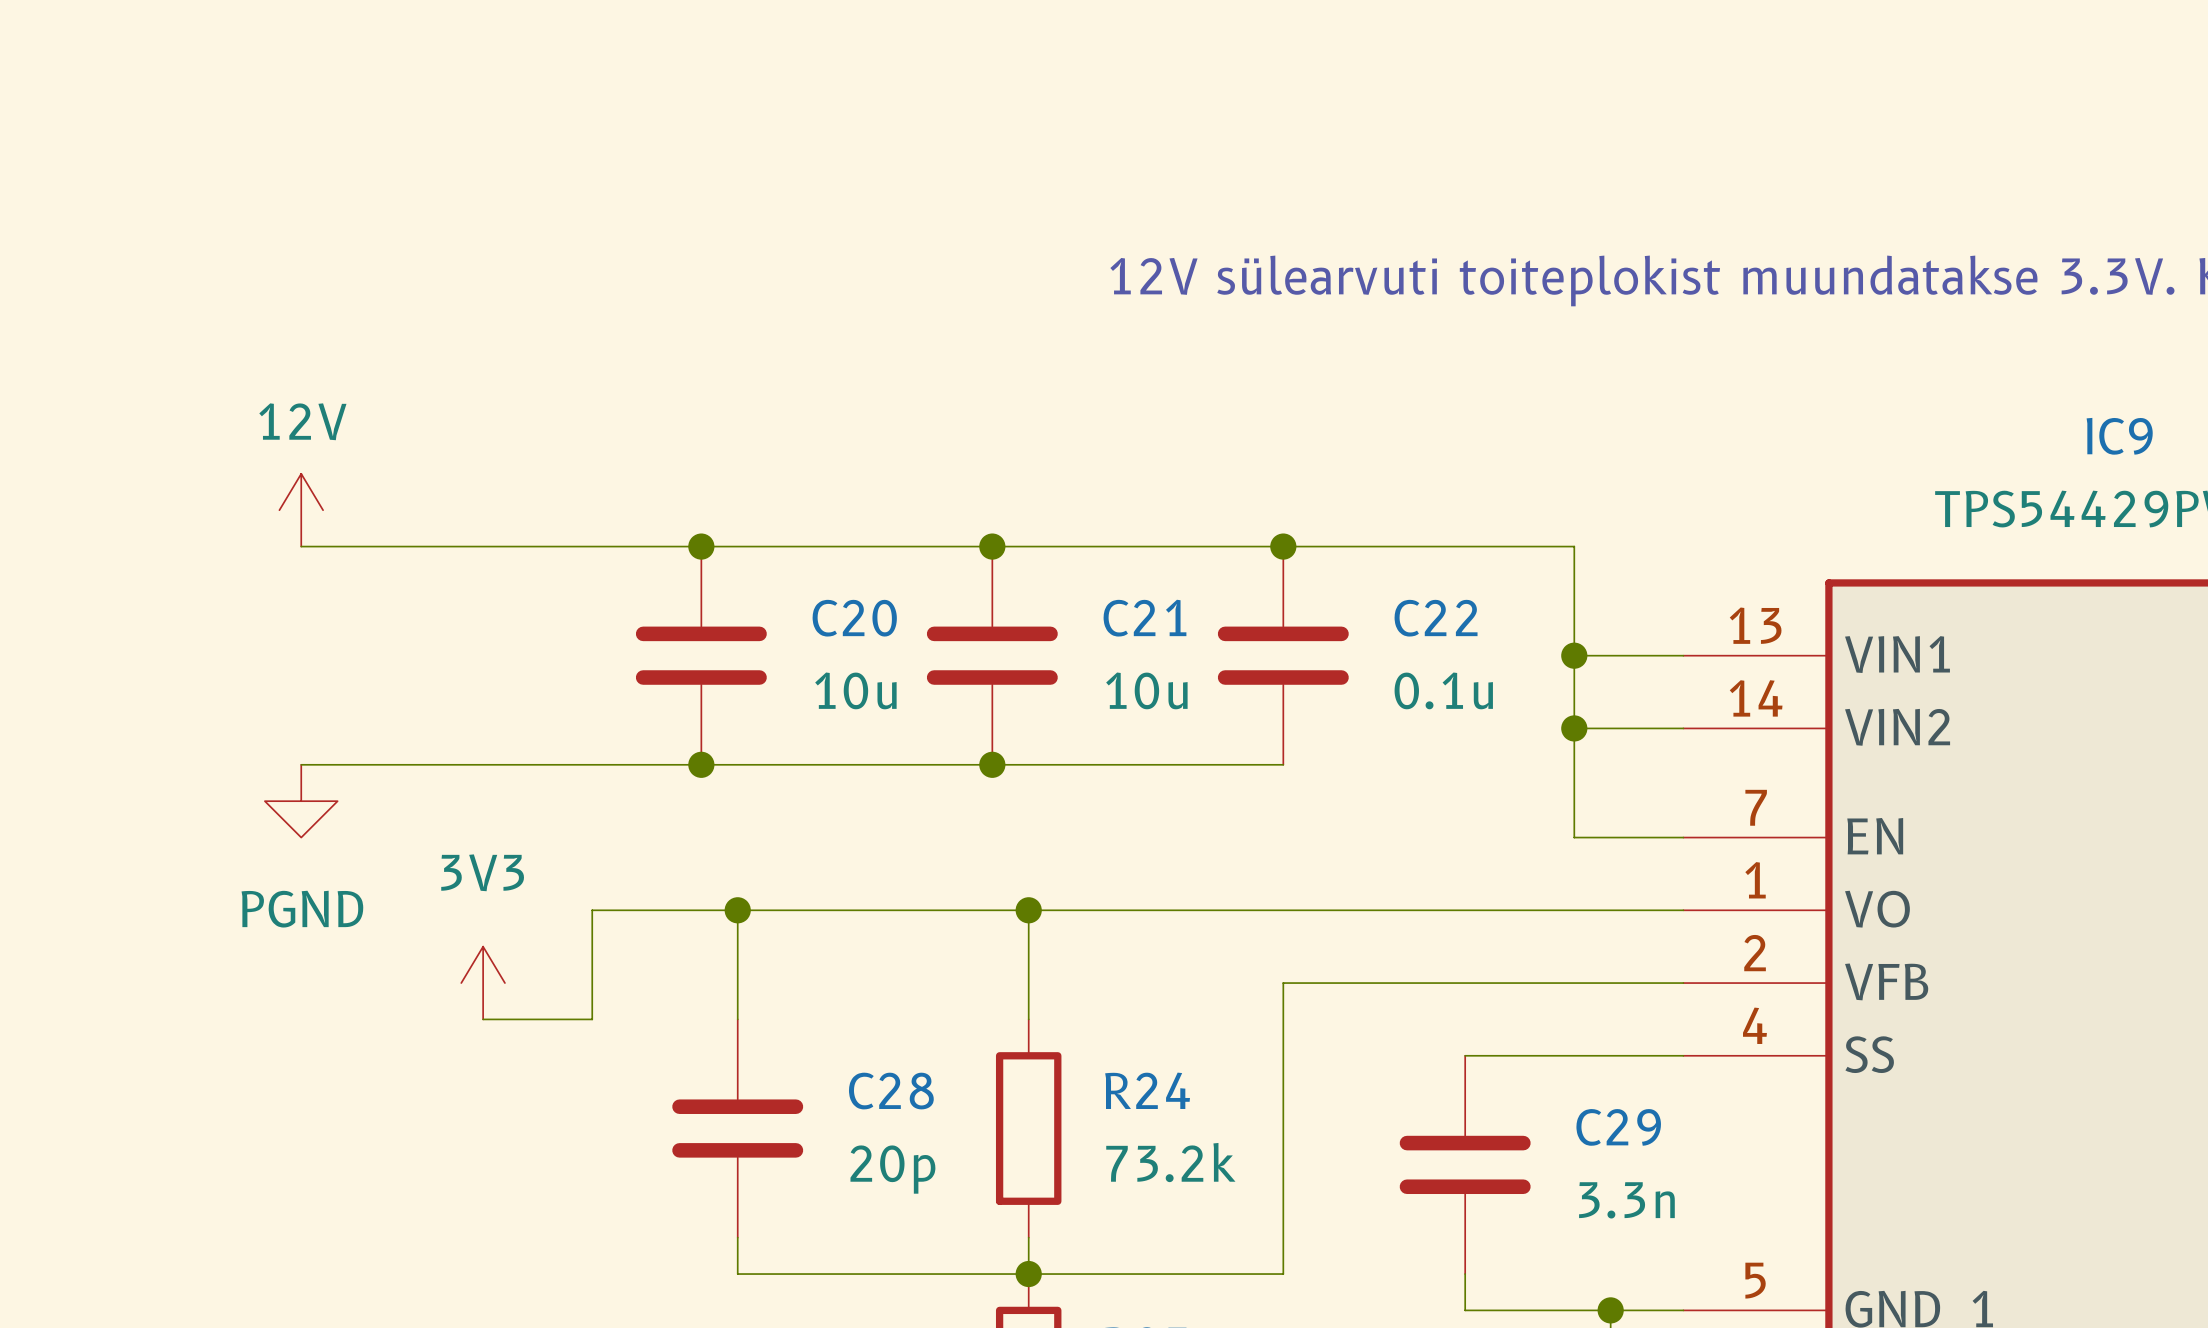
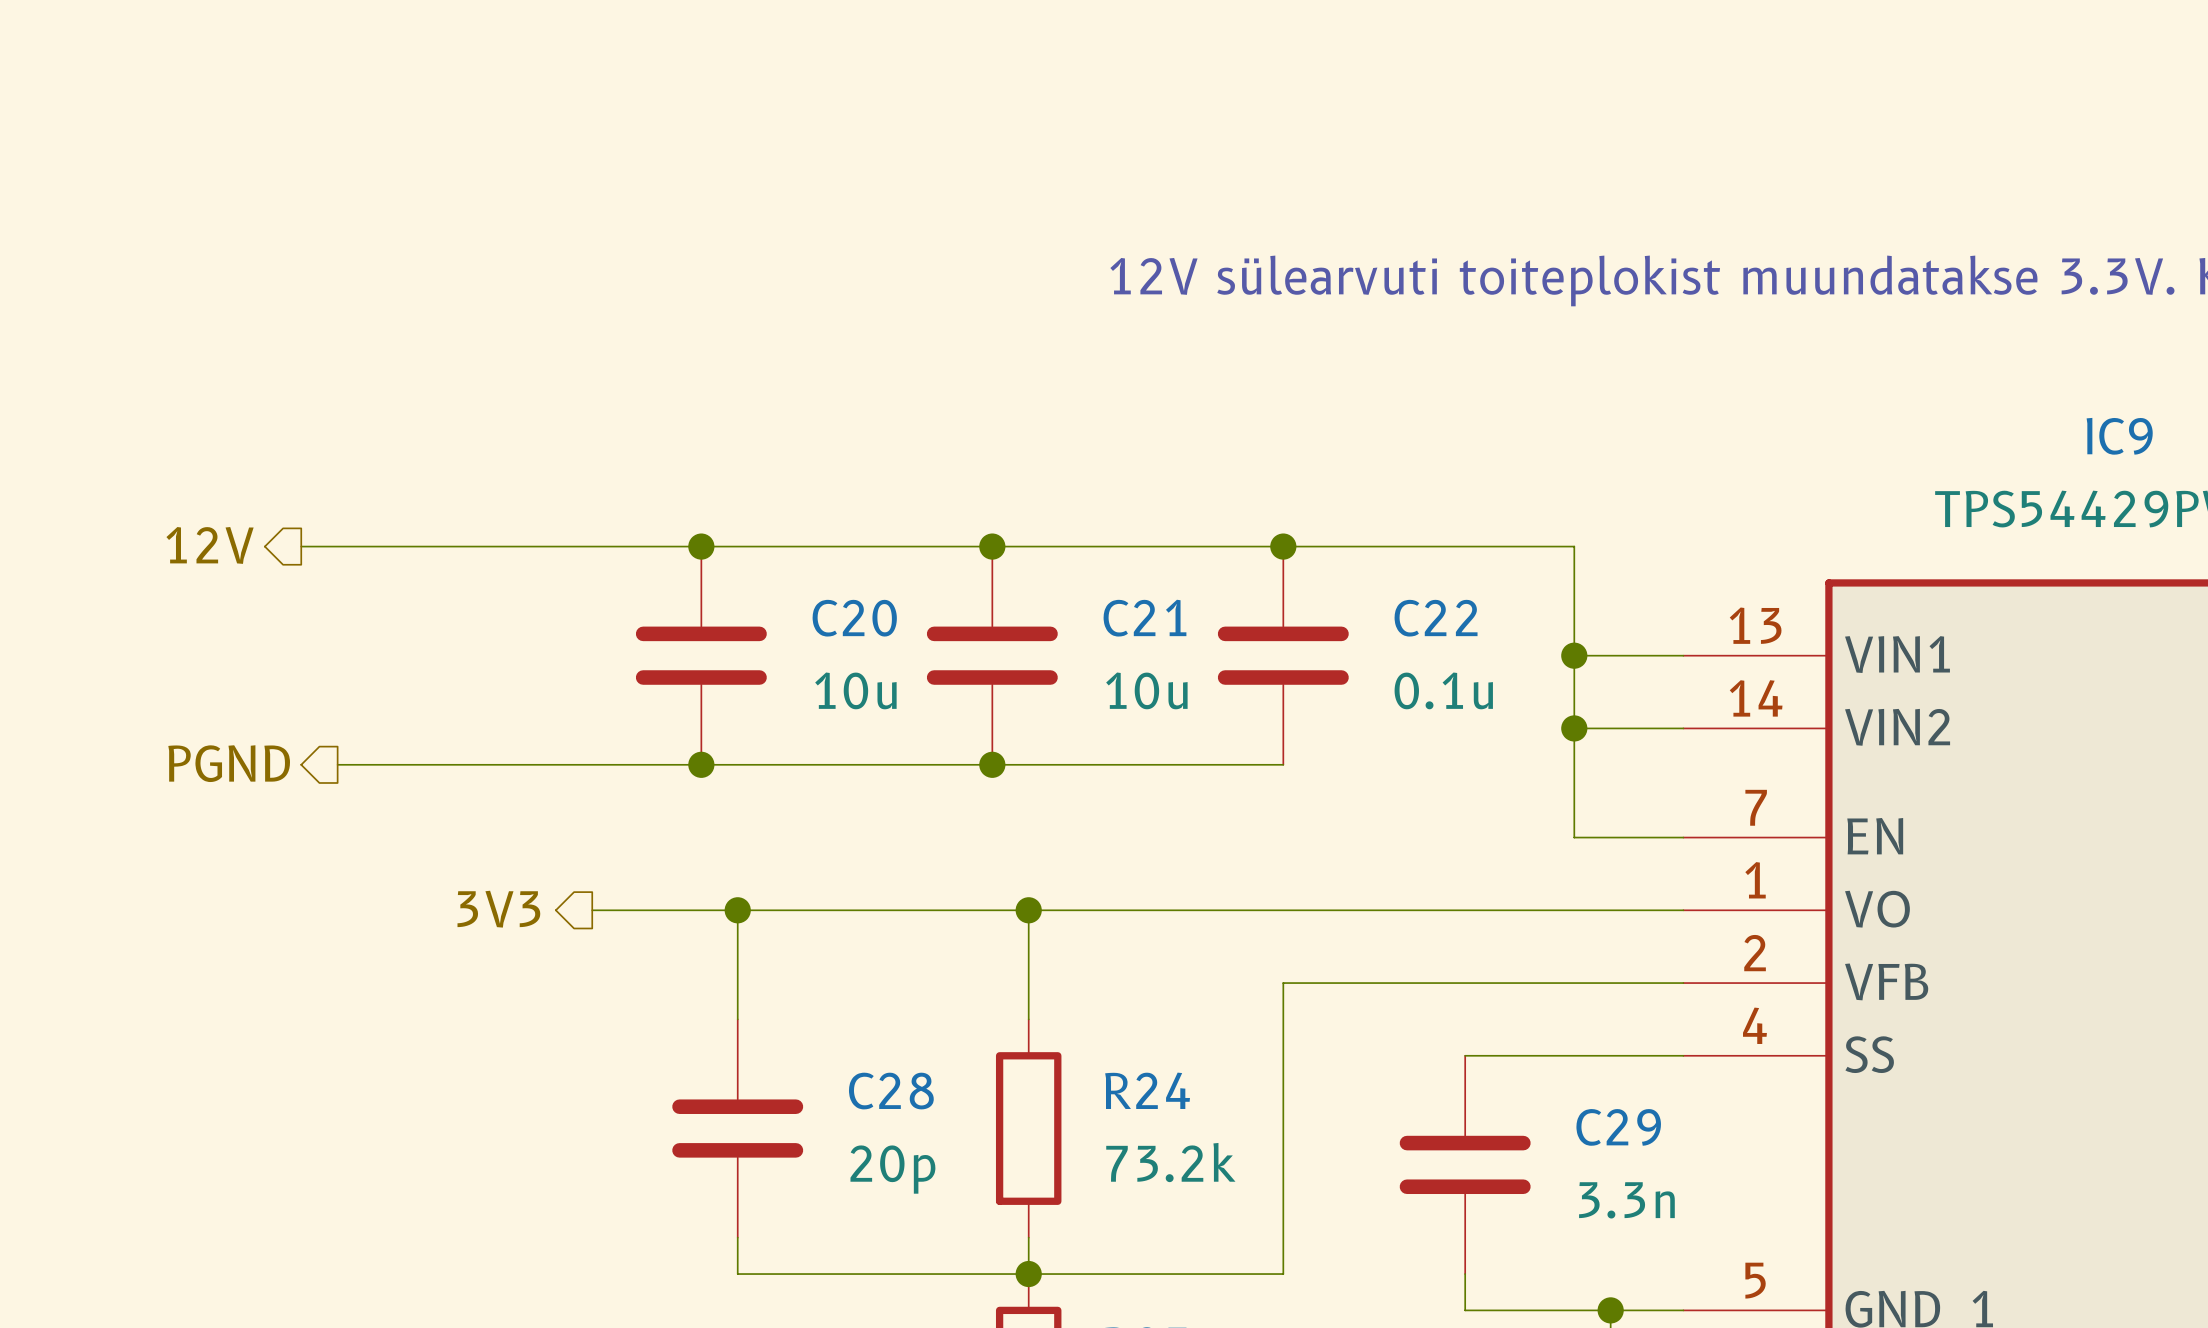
power symbol: 12V (301, 510) -> none
hierarchical label: none -> 12V (210, 545)
hierarchical label: none -> PGND (229, 763)
wire: (301, 764) (337, 764) -> none
power symbol: PGND (301, 801) -> none
hierarchical label: none -> 3V3 (498, 909)
wire: (592, 910) (592, 1019) (483, 1019) -> none
power symbol: 3V3 (483, 983) -> none

